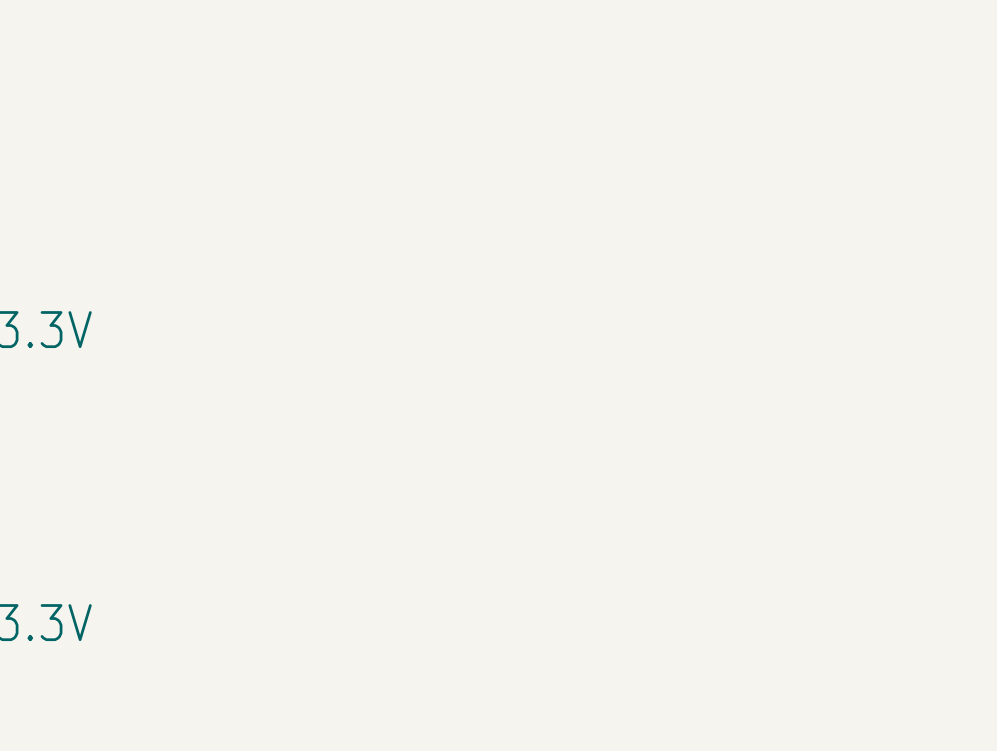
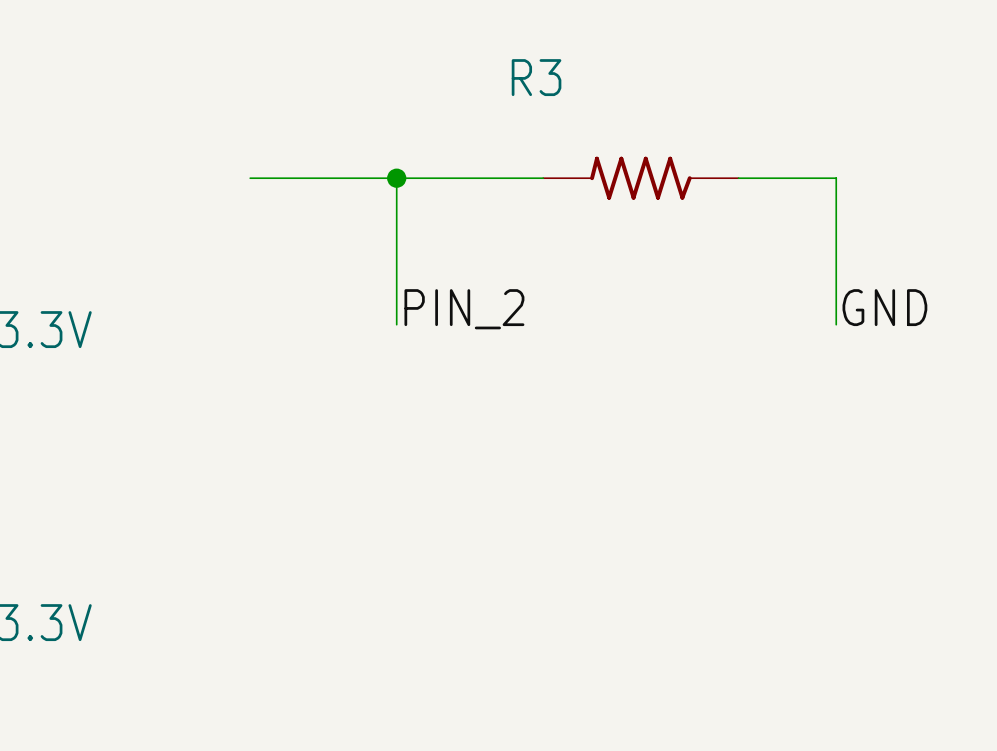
wire: none -> (250, 178) (543, 178)
wire: none -> (396, 178) (396, 324)
junction: none -> (396, 178)
R3: none -> (640, 178)
wire: none -> (738, 178) (836, 178) (836, 324)
label: none -> GND (884, 307)
label: none -> PIN_2 (464, 309)

